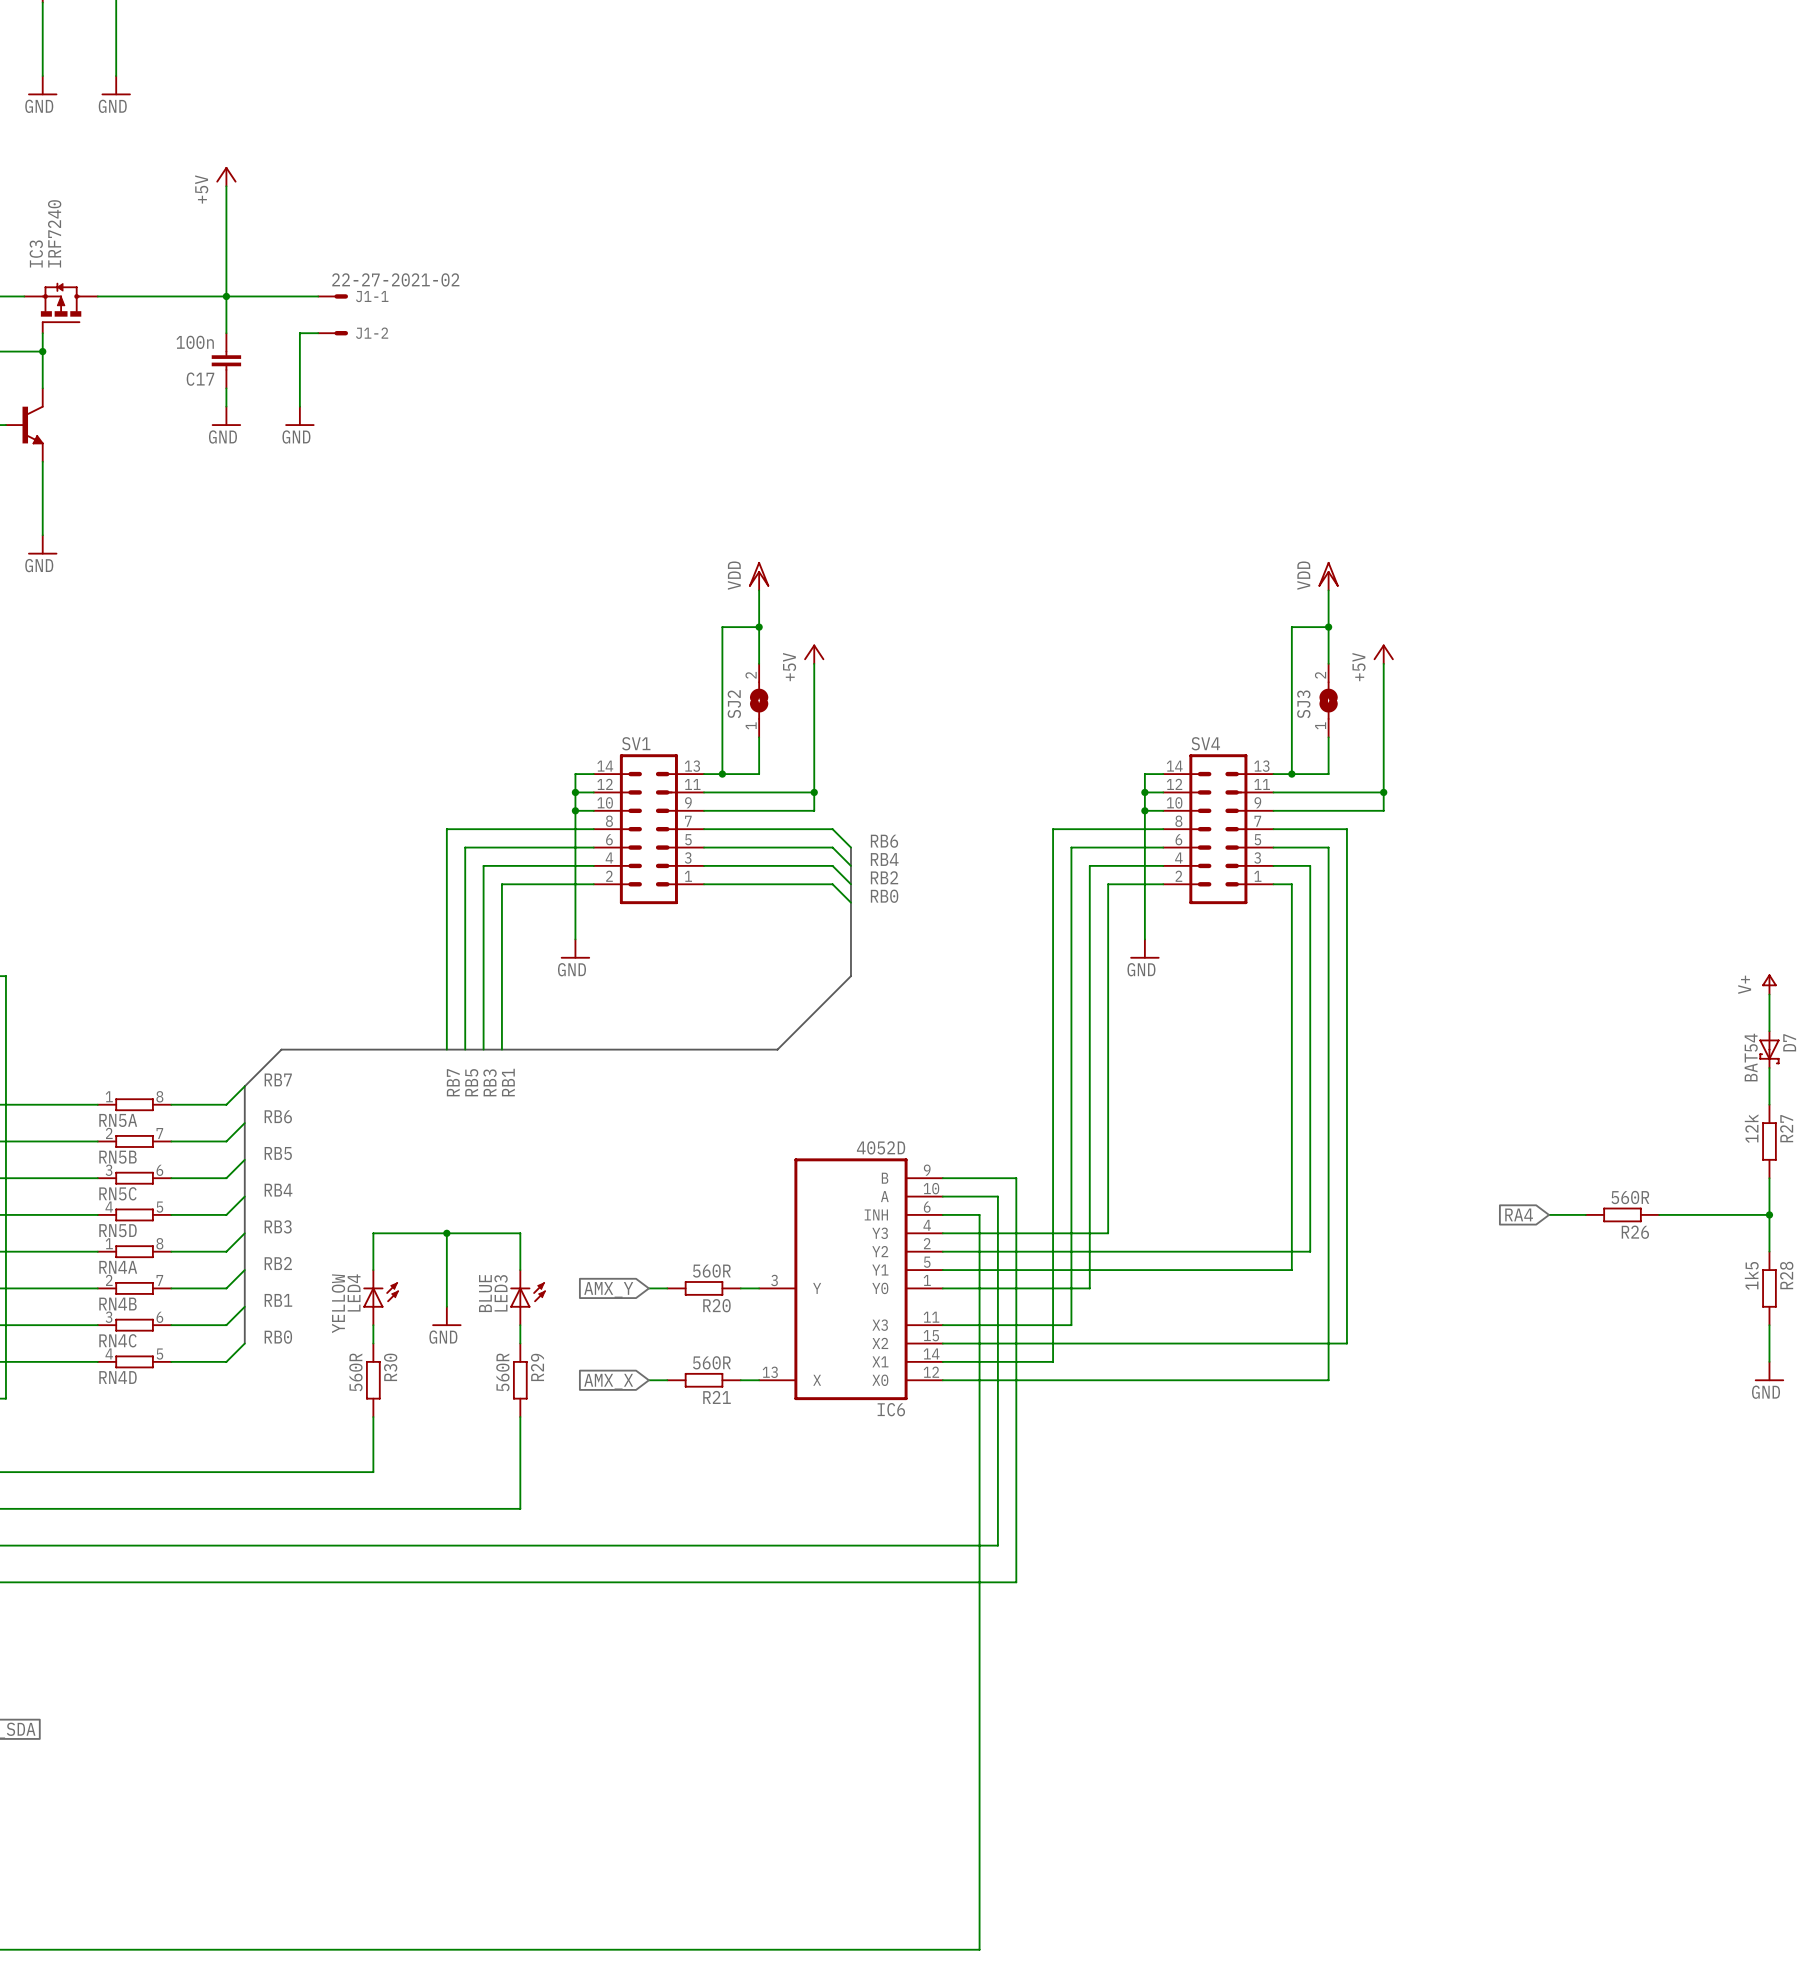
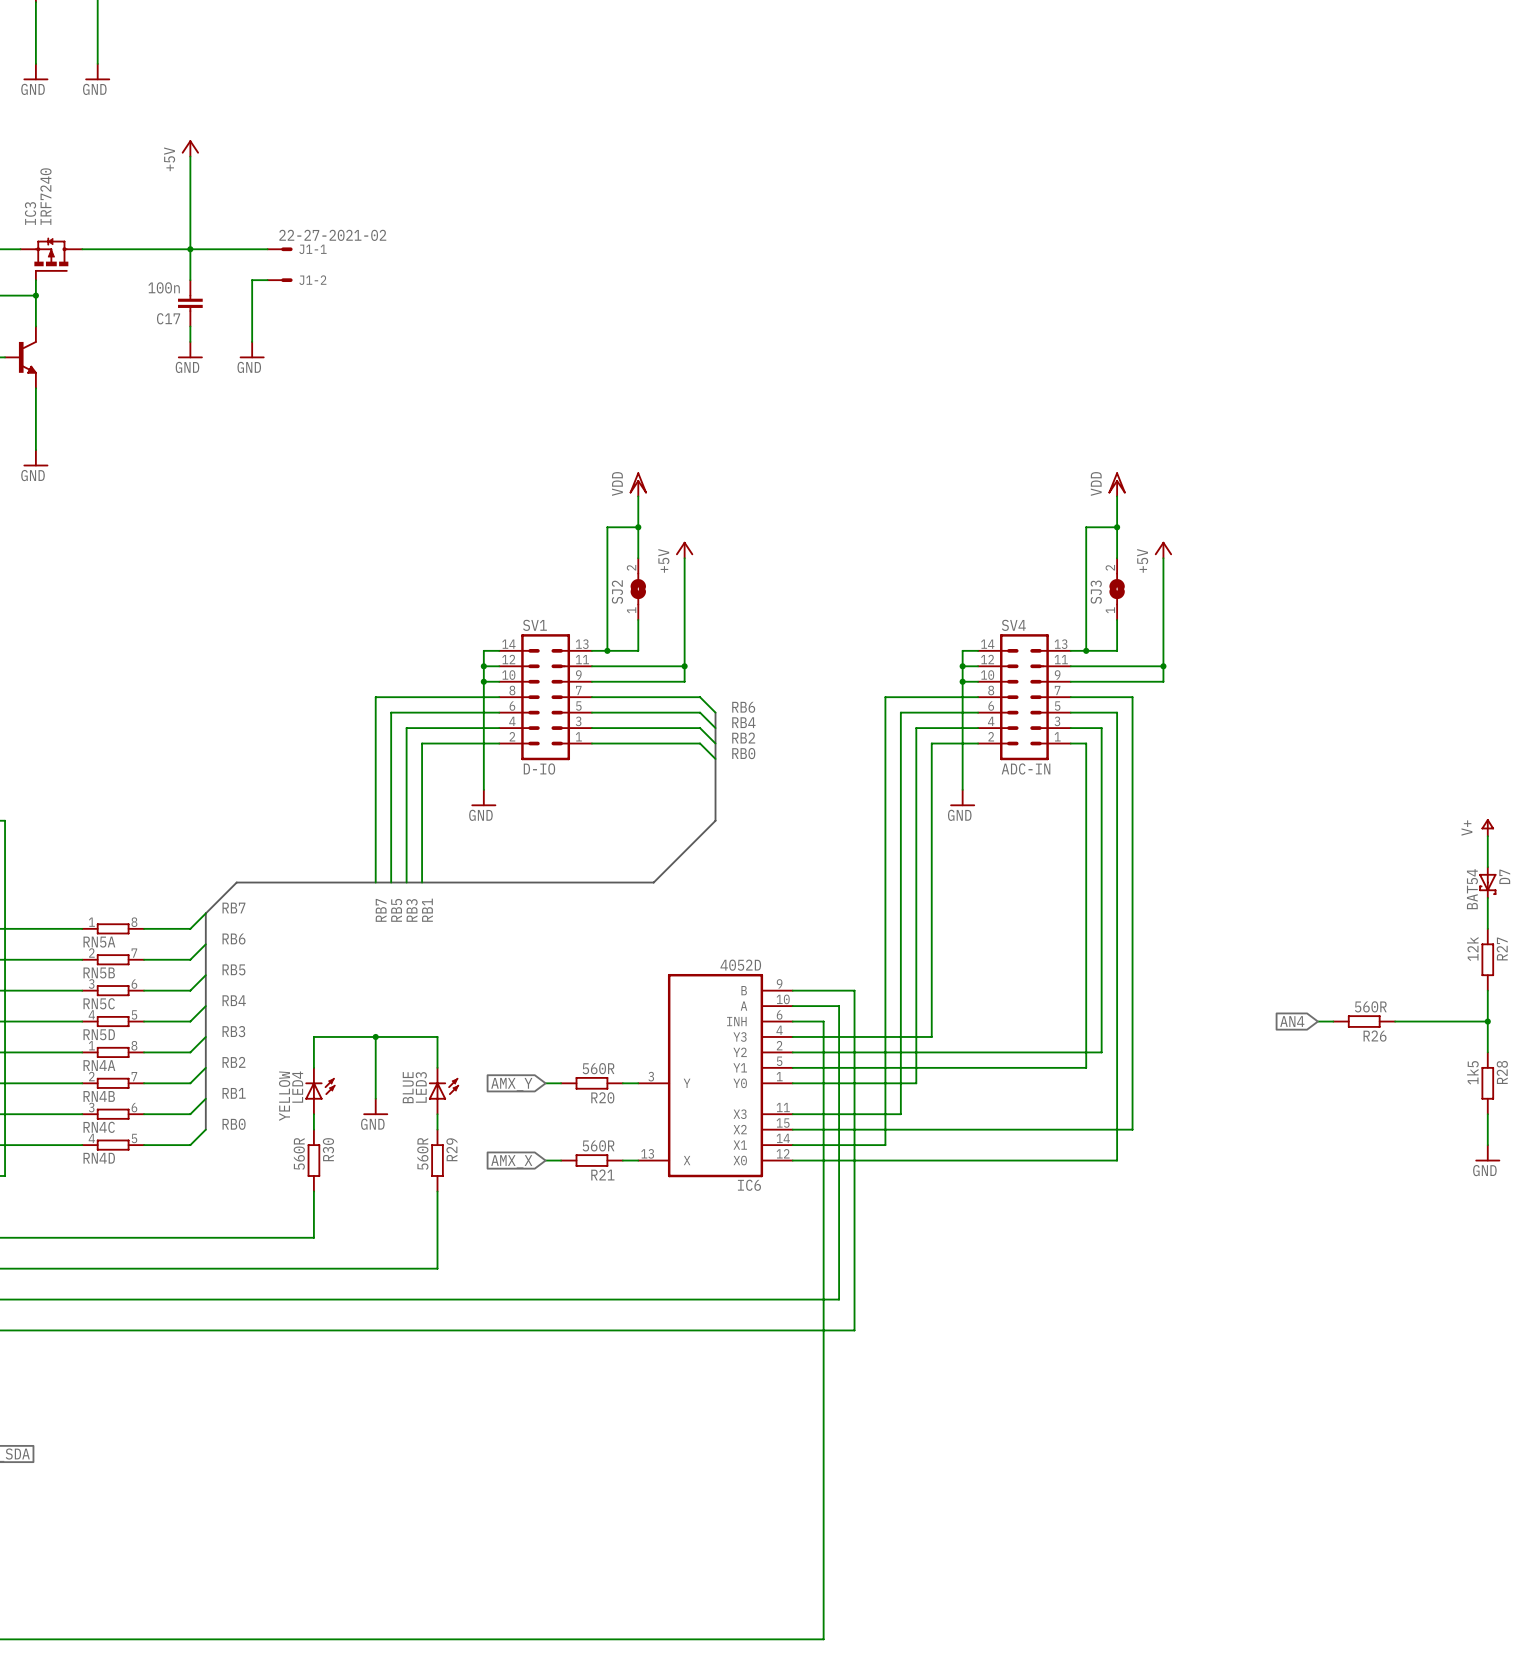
SV1 value: none -> D-IO (539, 769)
SV4 value: none -> ADC-IN (1026, 769)
global label: RA4 (1519, 1214) -> AN4 (1292, 1021)
wire: (1549, 1214) (1567, 1214) -> none

